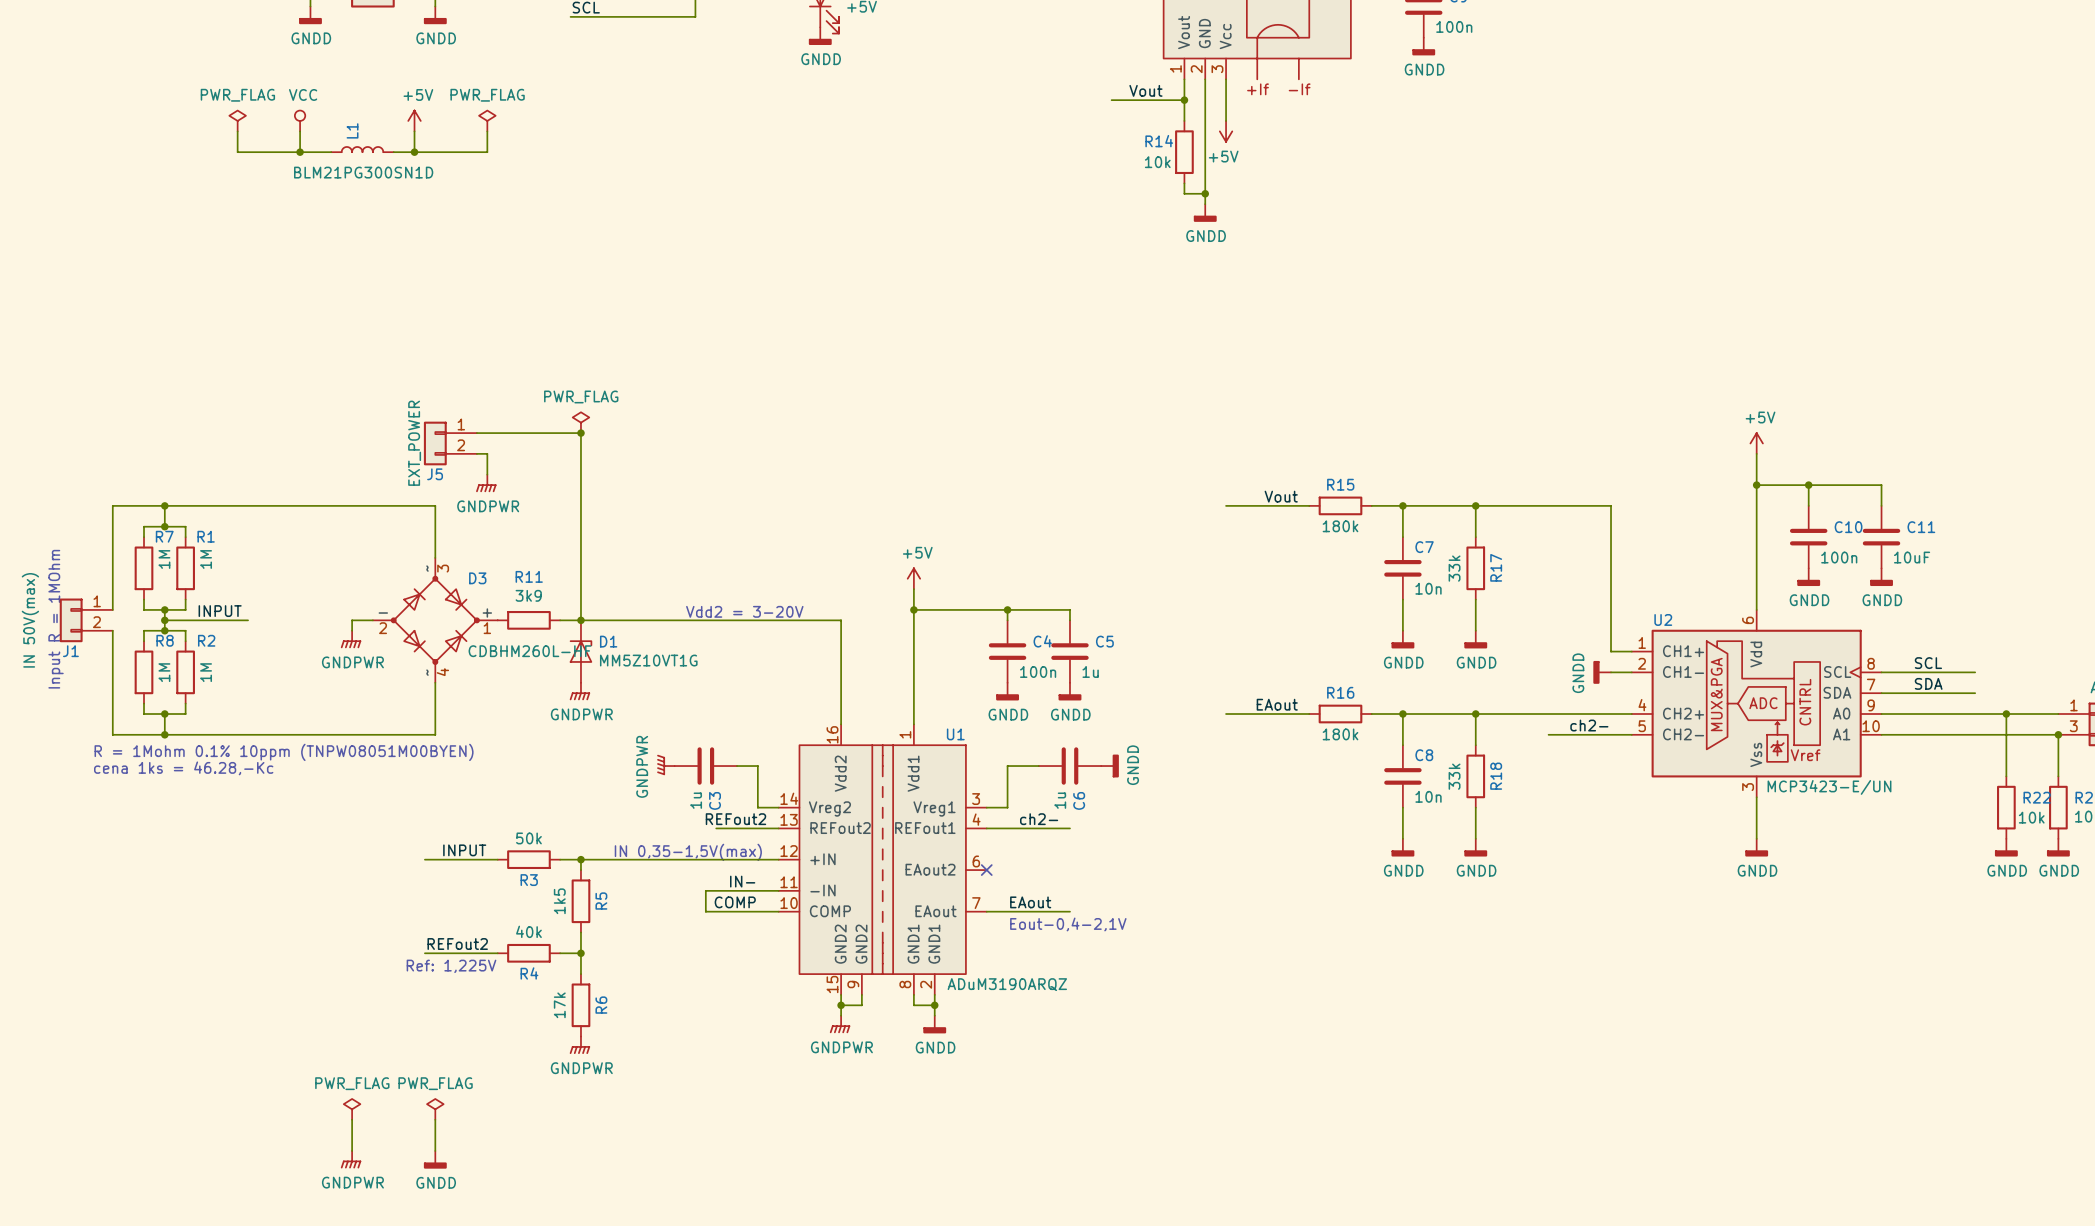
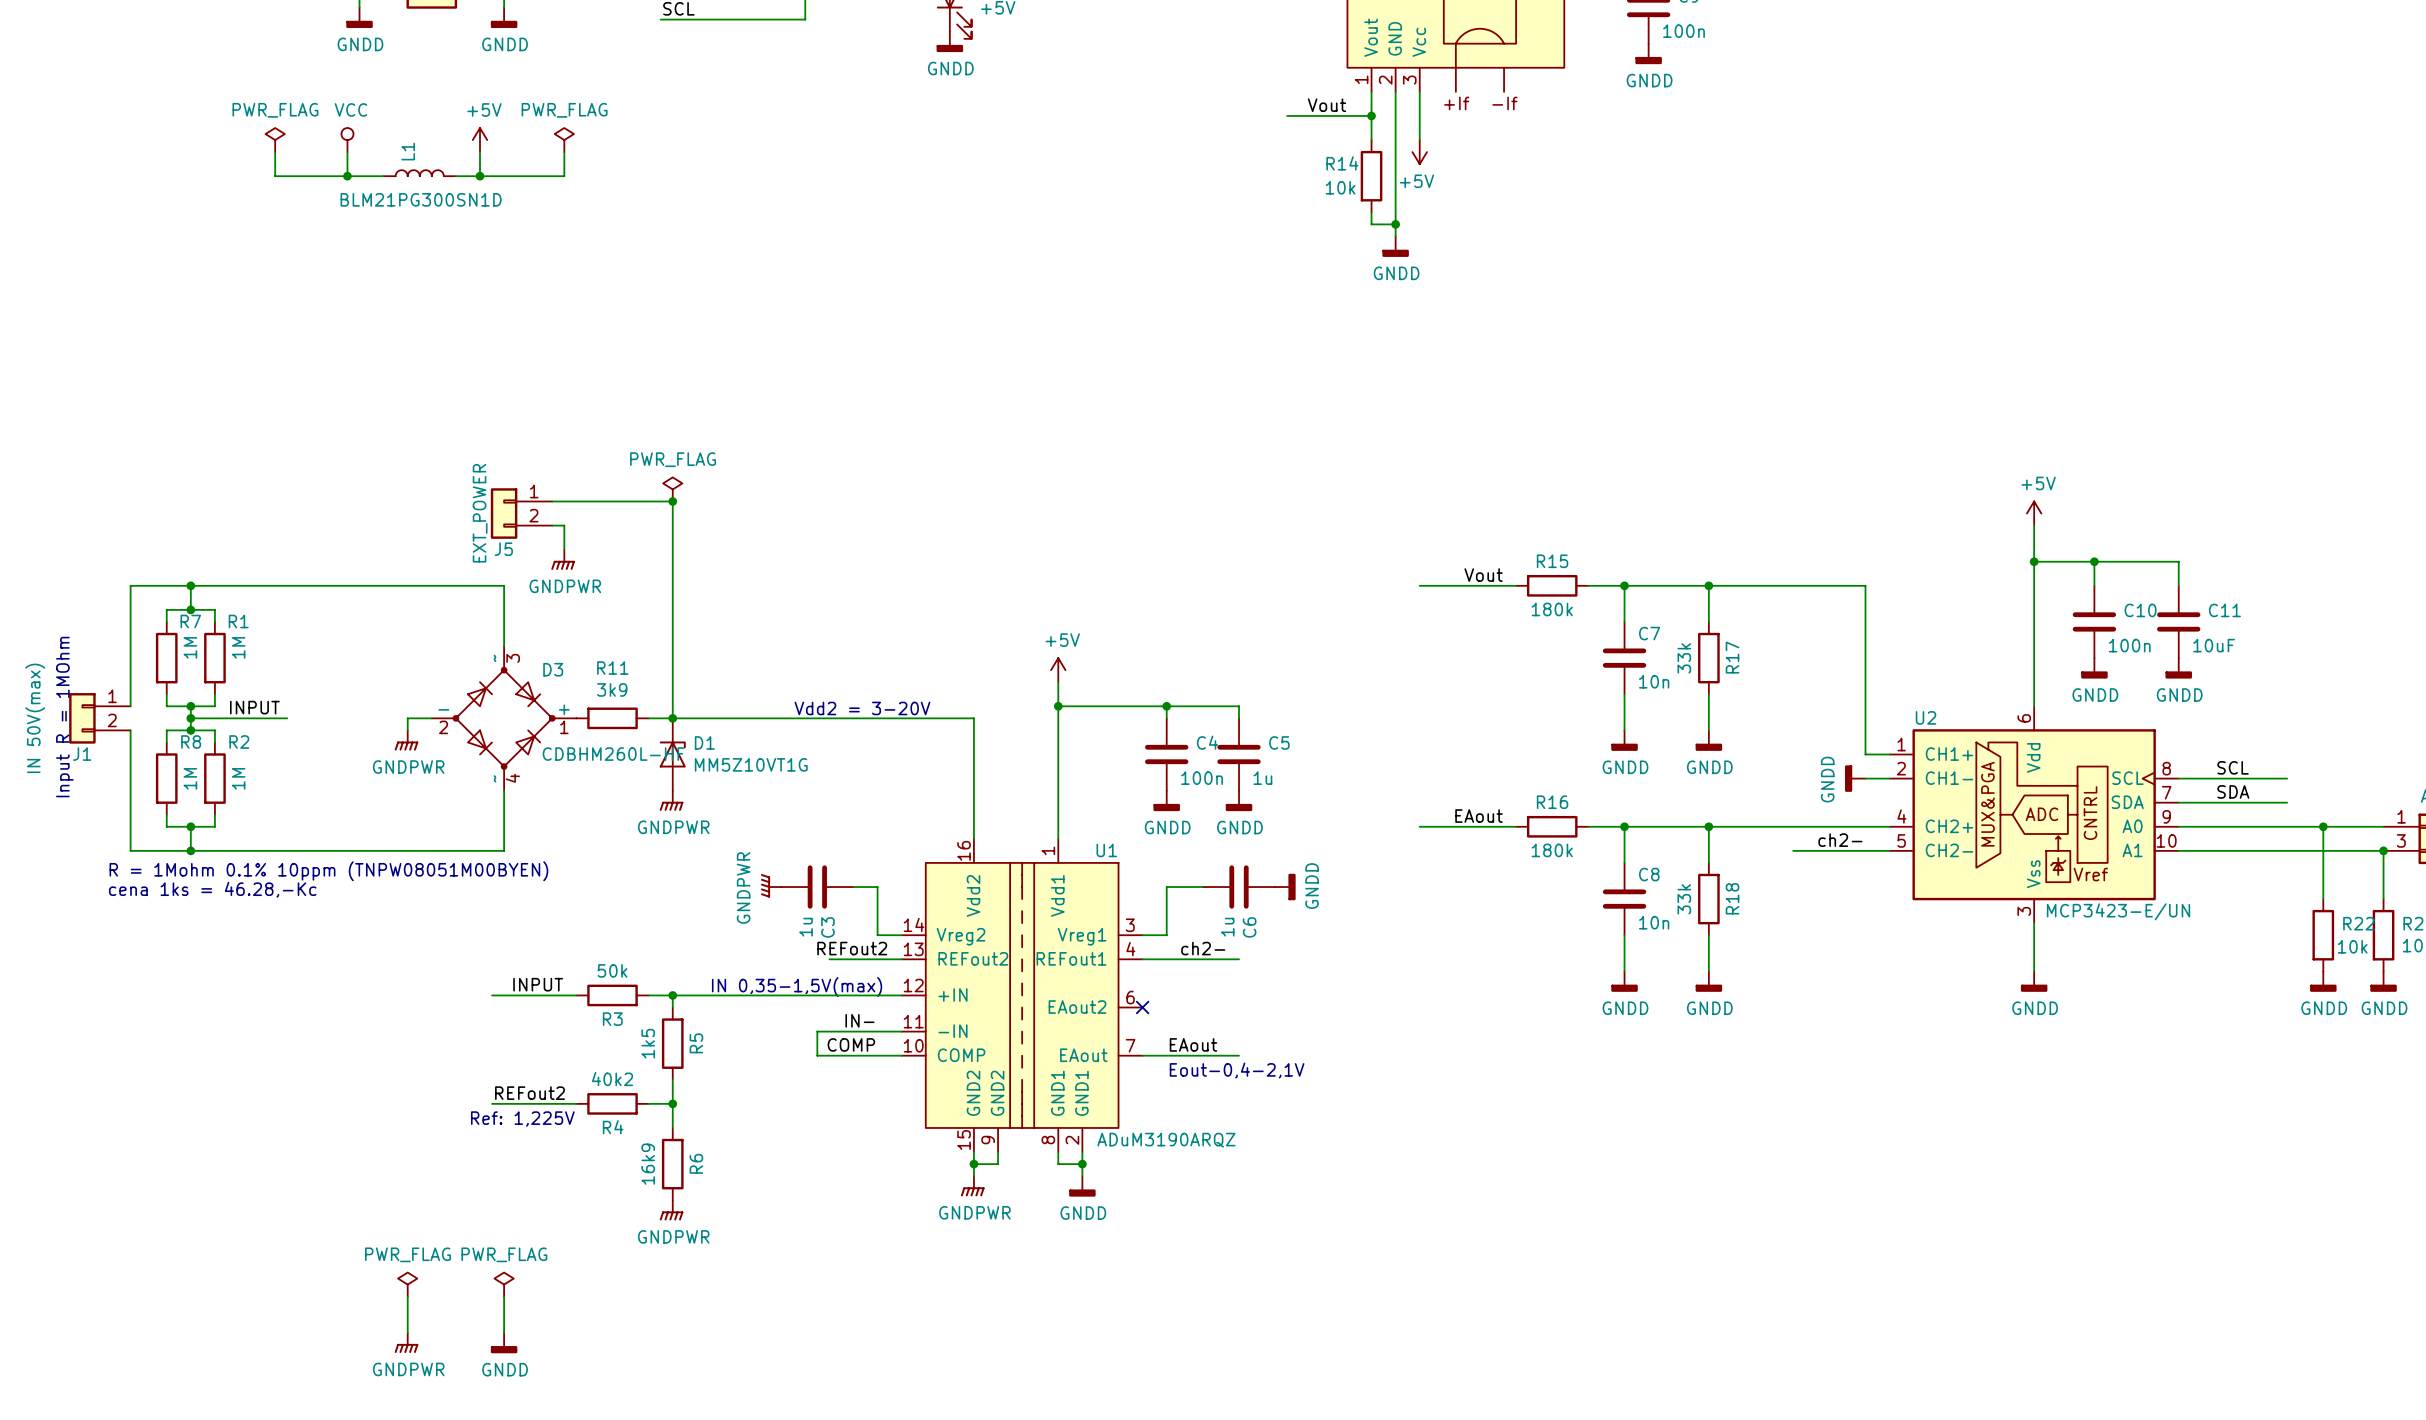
R4 value: 40k (528, 931) -> 40k2 (612, 1079)
R6 value: 17k (559, 1005) -> 16k9 (648, 1164)

